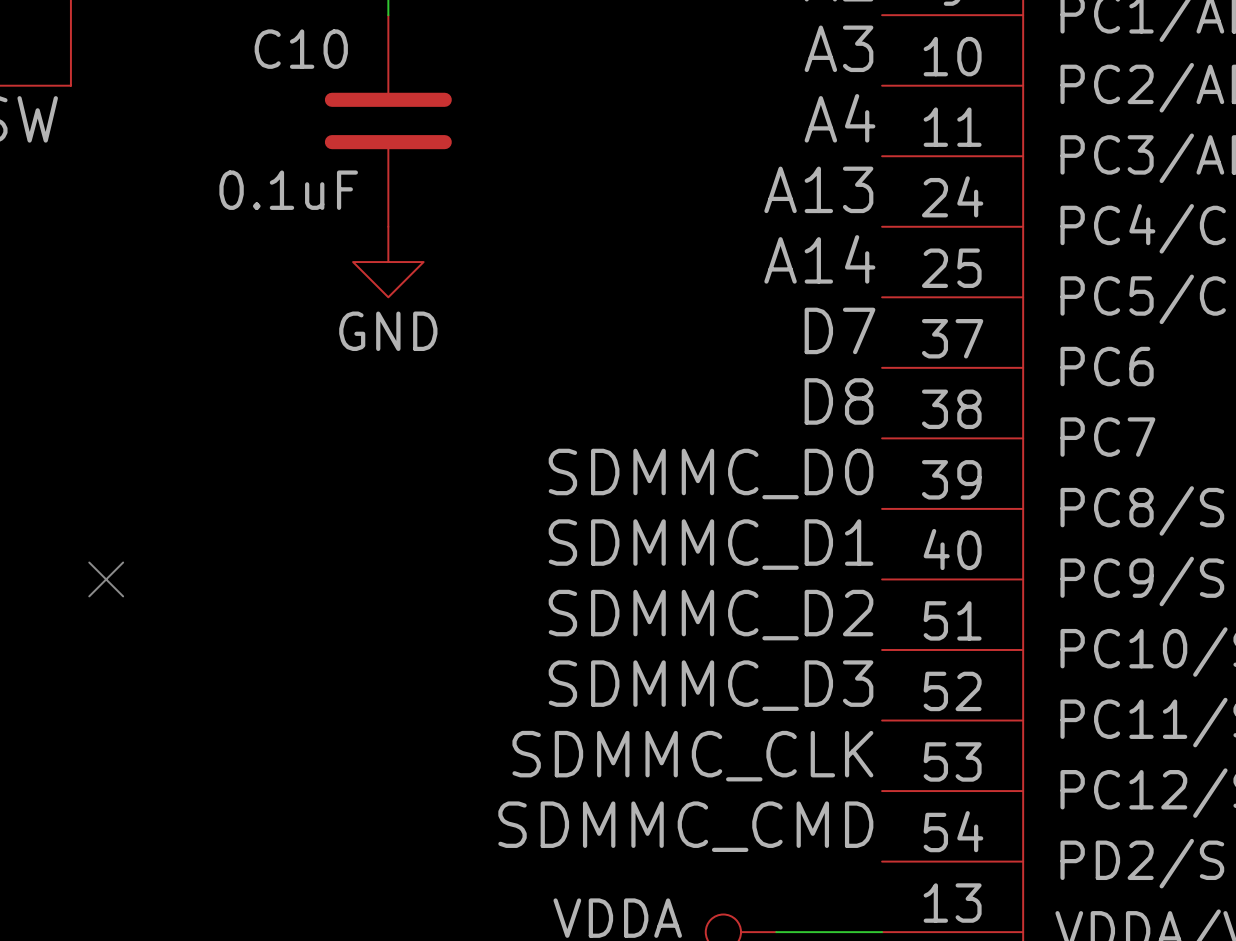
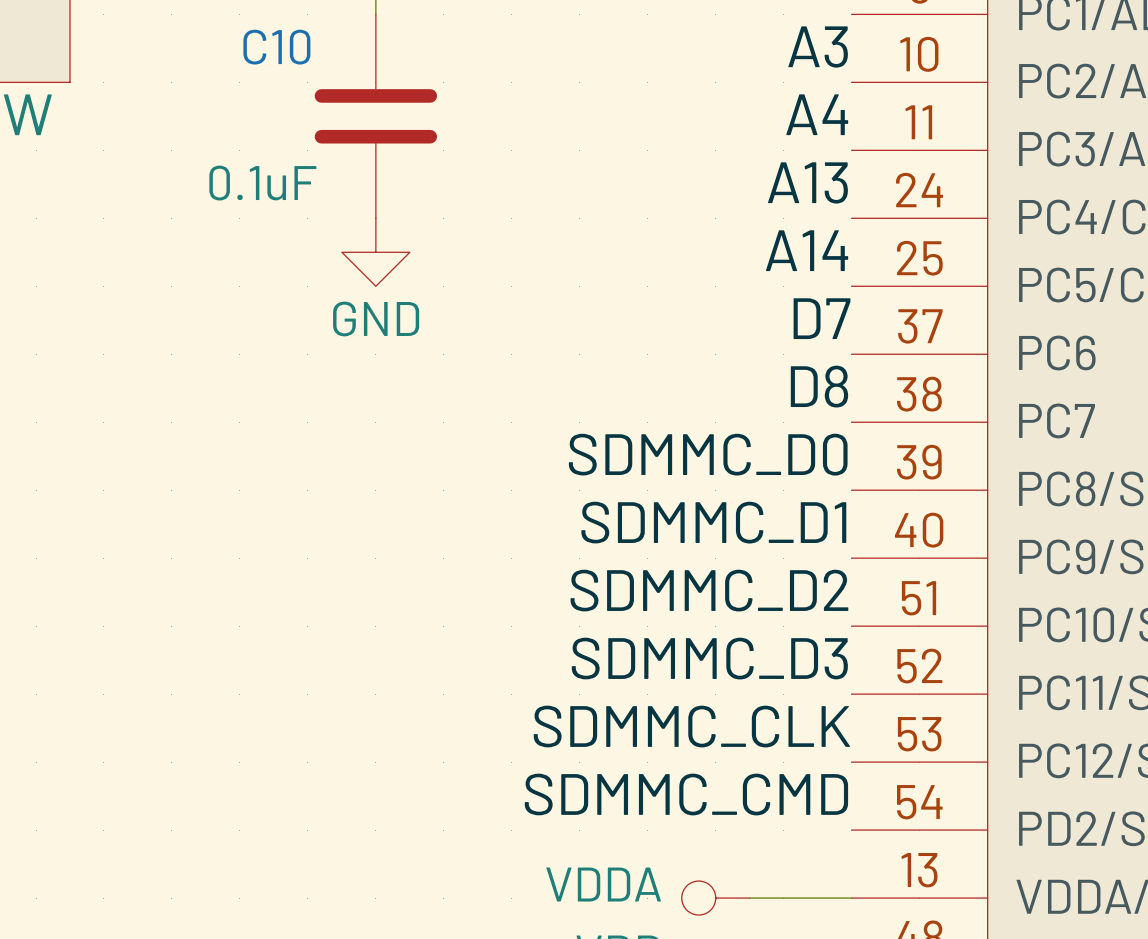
no-connect mark: (106, 579) -> none

